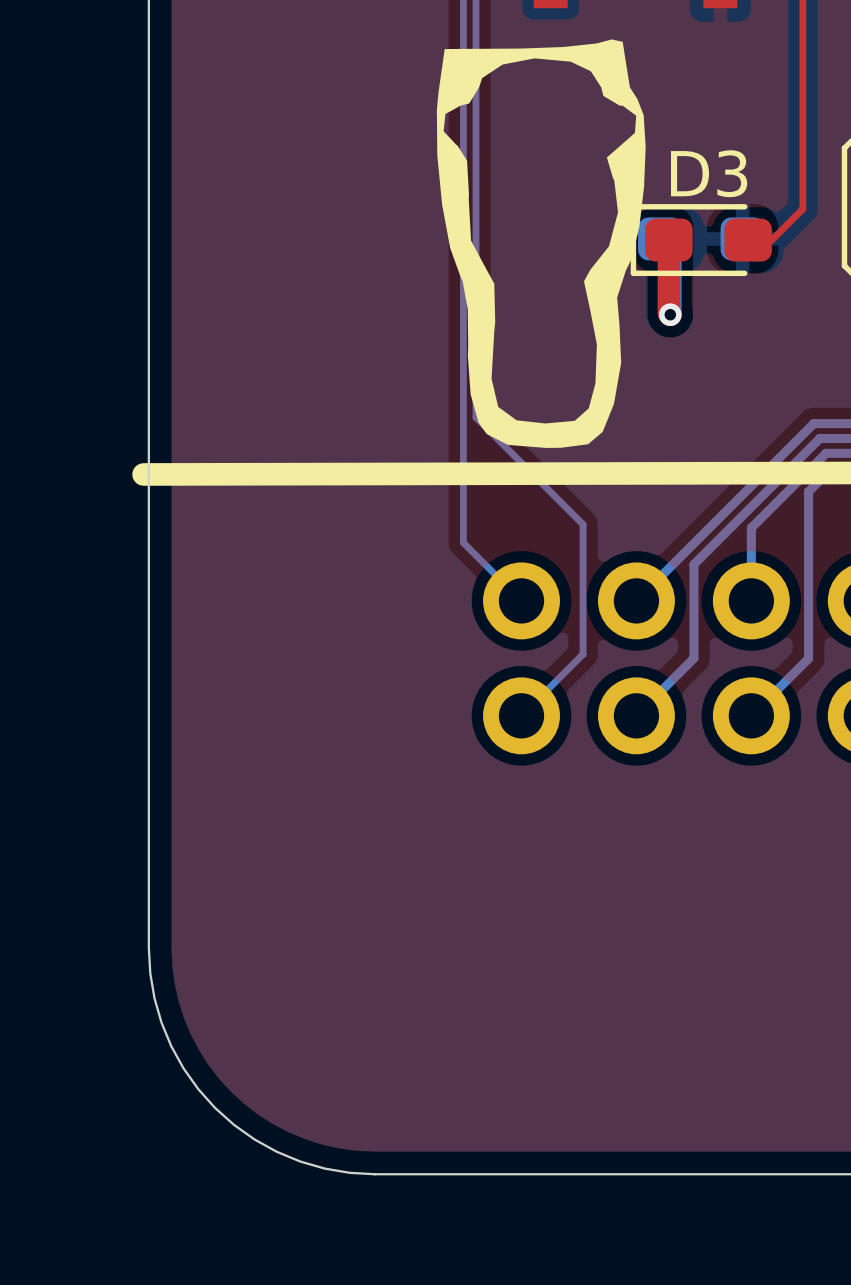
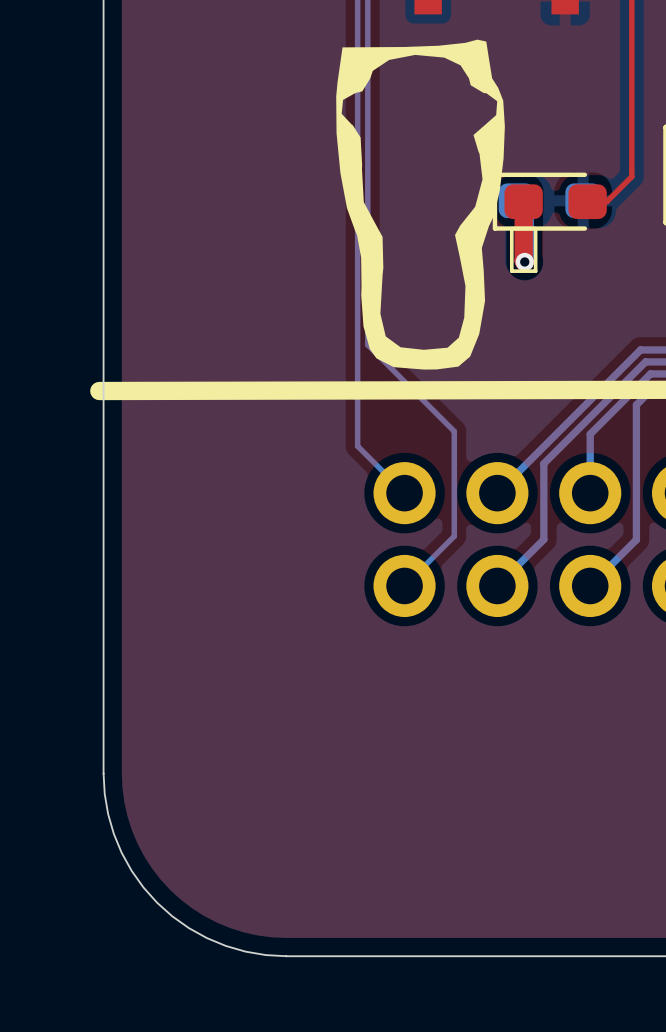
D3 name: D3 (709, 173) -> none
line: none -> (511, 228) (535, 228) (535, 271) (511, 271) (511, 228)

